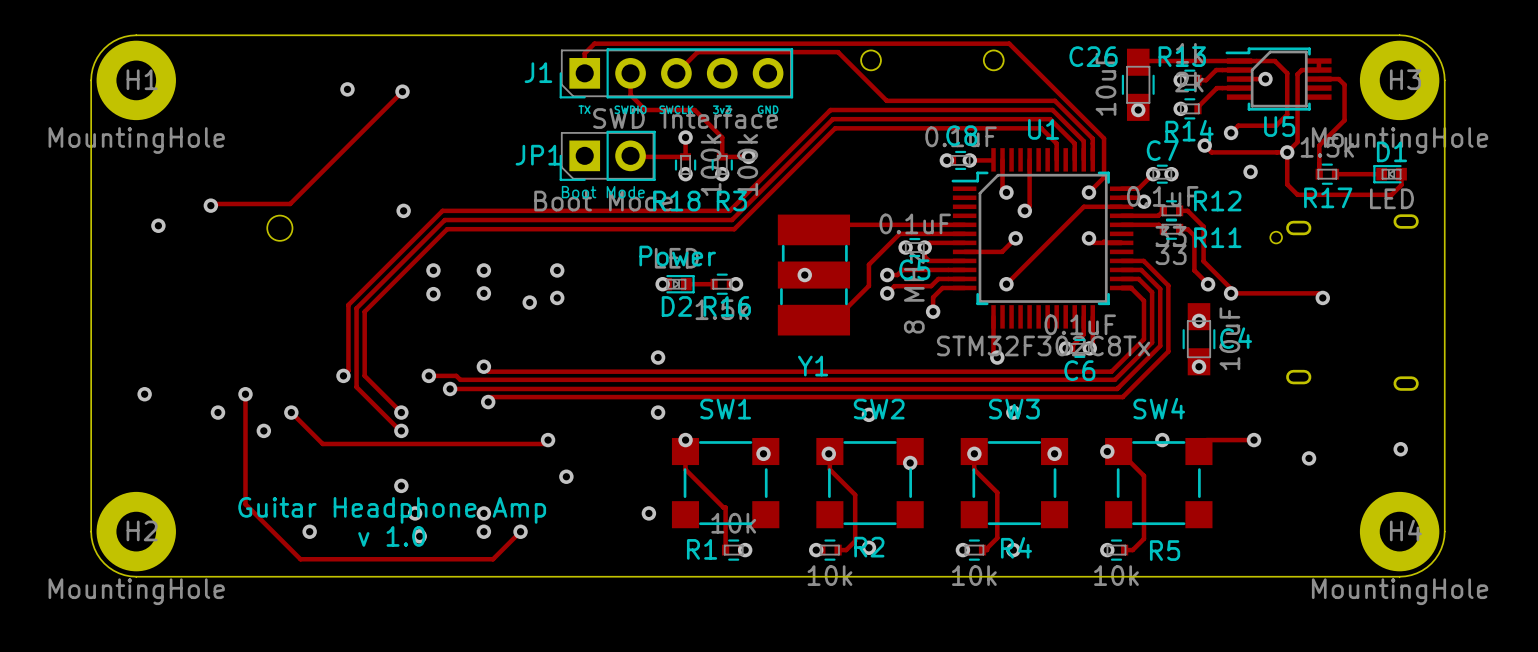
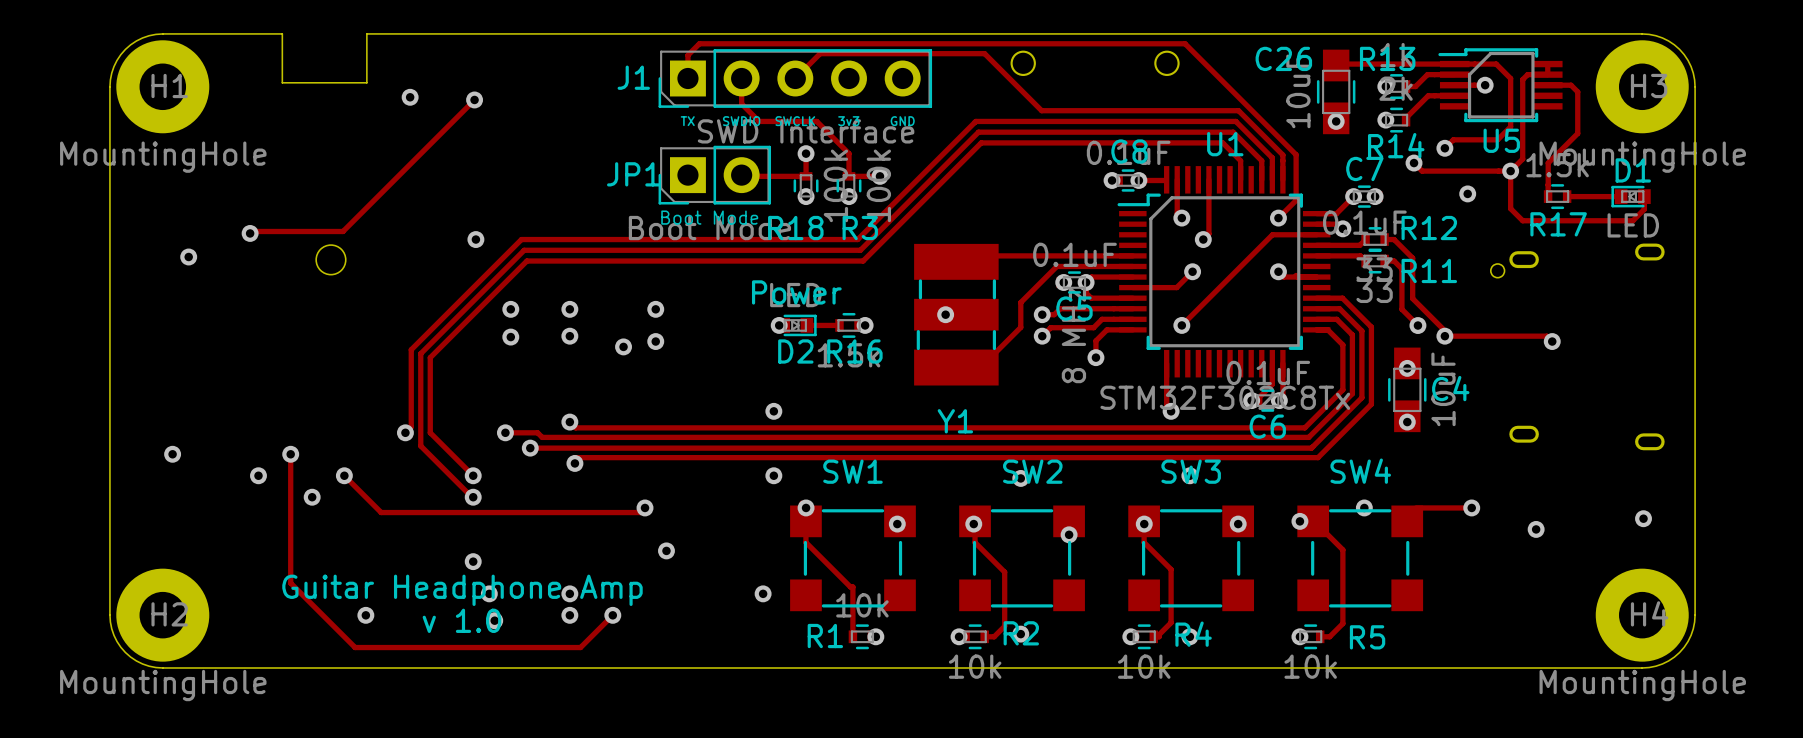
board edge: (238, 35) (310, 35) -> (282, 33) (282, 82) (366, 82) (366, 33)

